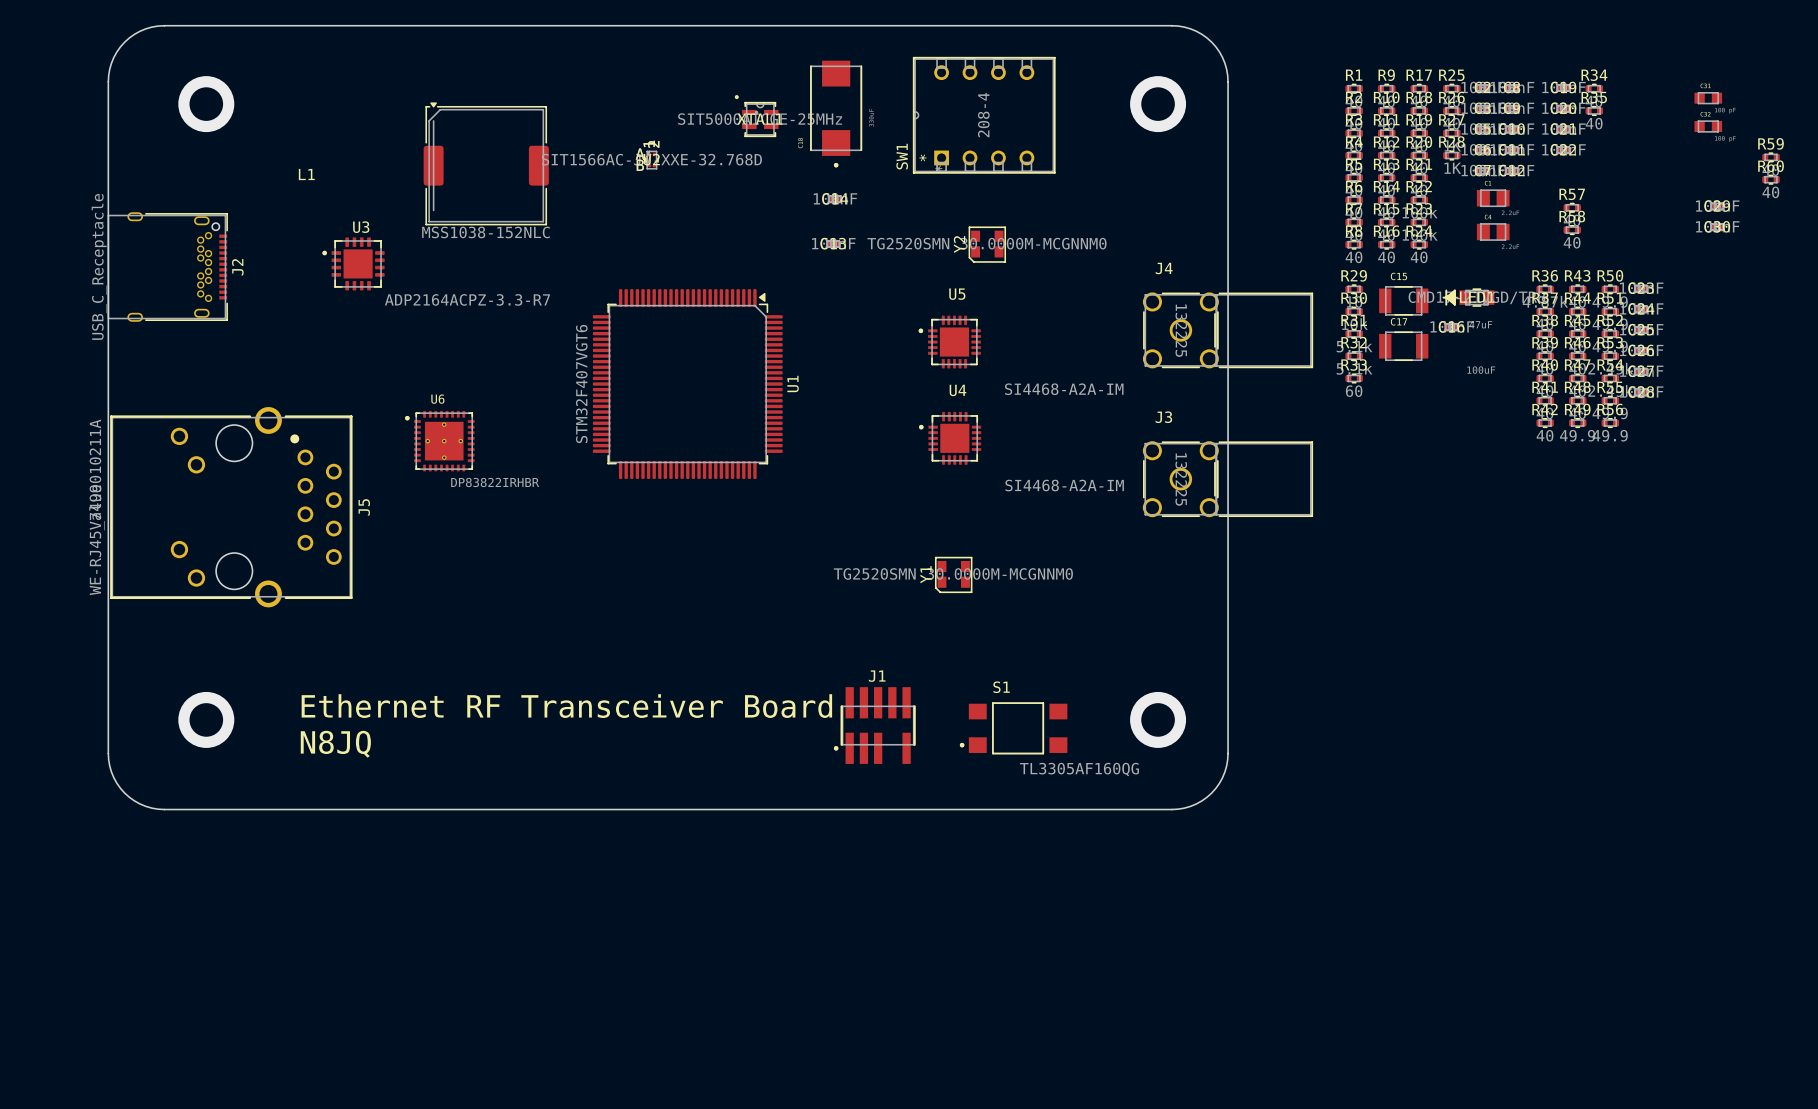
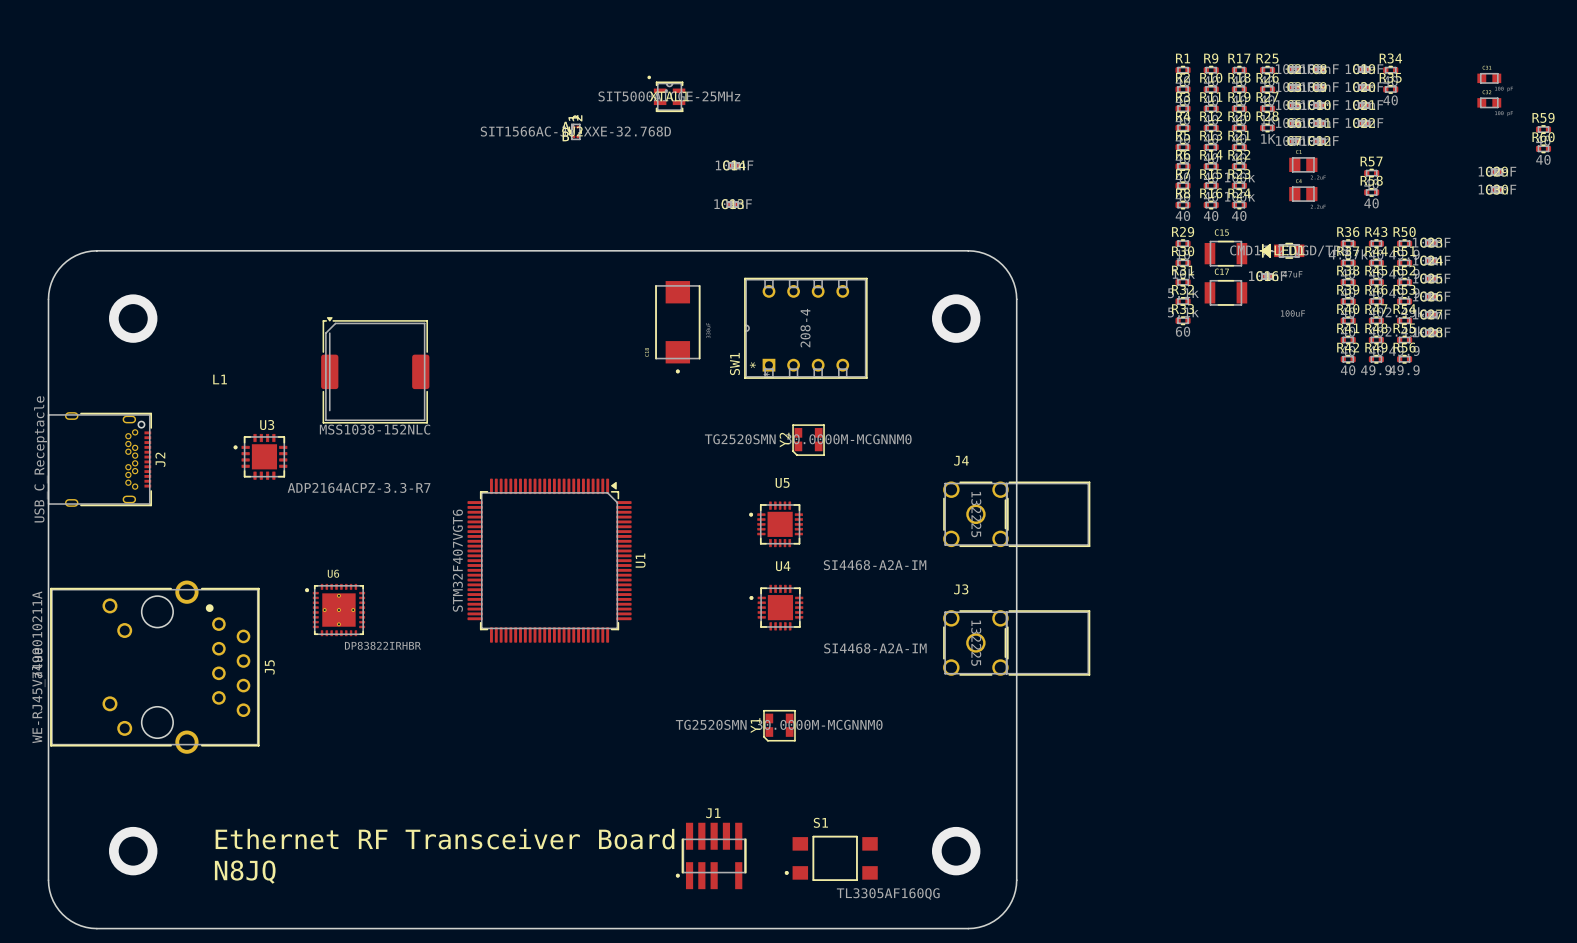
board edge: (164, 25) (1172, 25) (1190, 28) (1206, 37) (1222, 57) (1228, 81) (1228, 753) (1224, 772) (1215, 788) (1196, 803) (1172, 809) (164, 809) (145, 806) (129, 797) (113, 777) (108, 753) (108, 81) (113, 57) (124, 42) (140, 31) (164, 25) -> (96, 250) (968, 250) (984, 253) (998, 261) (1011, 278) (1016, 299) (1016, 880) (1013, 896) (1006, 910) (989, 923) (968, 928) (96, 928) (80, 925) (66, 918) (53, 901) (48, 880) (48, 299) (51, 283) (62, 265) (80, 253) (96, 250)
via: (206, 104) -> none
via: (1158, 104) -> none
part position: (836, 114) -> (677, 327)
SW1 position: (984, 115) -> (805, 328)
L1 position: (486, 163) -> (375, 370)
Y2 position: (987, 244) -> (808, 440)
U3 position: (353, 263) -> (260, 456)
J2 position: (167, 267) -> (99, 459)
J4 position: (1228, 330) -> (1016, 514)
U5 position: (949, 342) -> (776, 524)
via: none -> (133, 318)
via: none -> (956, 318)
U1 position: (687, 384) -> (549, 560)
U4 position: (950, 438) -> (776, 607)
U6 position: (439, 441) -> (335, 610)
J3 position: (1227, 479) -> (1016, 642)
J5 position: (231, 507) -> (154, 667)
Y1 position: (953, 574) -> (779, 725)
text position: Ethernet RF Transceiver Board (566, 706) -> Ethernet RF Transceiver Board (444, 839)
via: (206, 719) -> none
via: (1158, 719) -> none
J1 position: (874, 725) -> (711, 855)
S1 position: (1013, 728) -> (831, 858)
text position: N8JQ (335, 744) -> N8JQ (245, 872)
via: none -> (133, 851)
via: none -> (956, 851)

